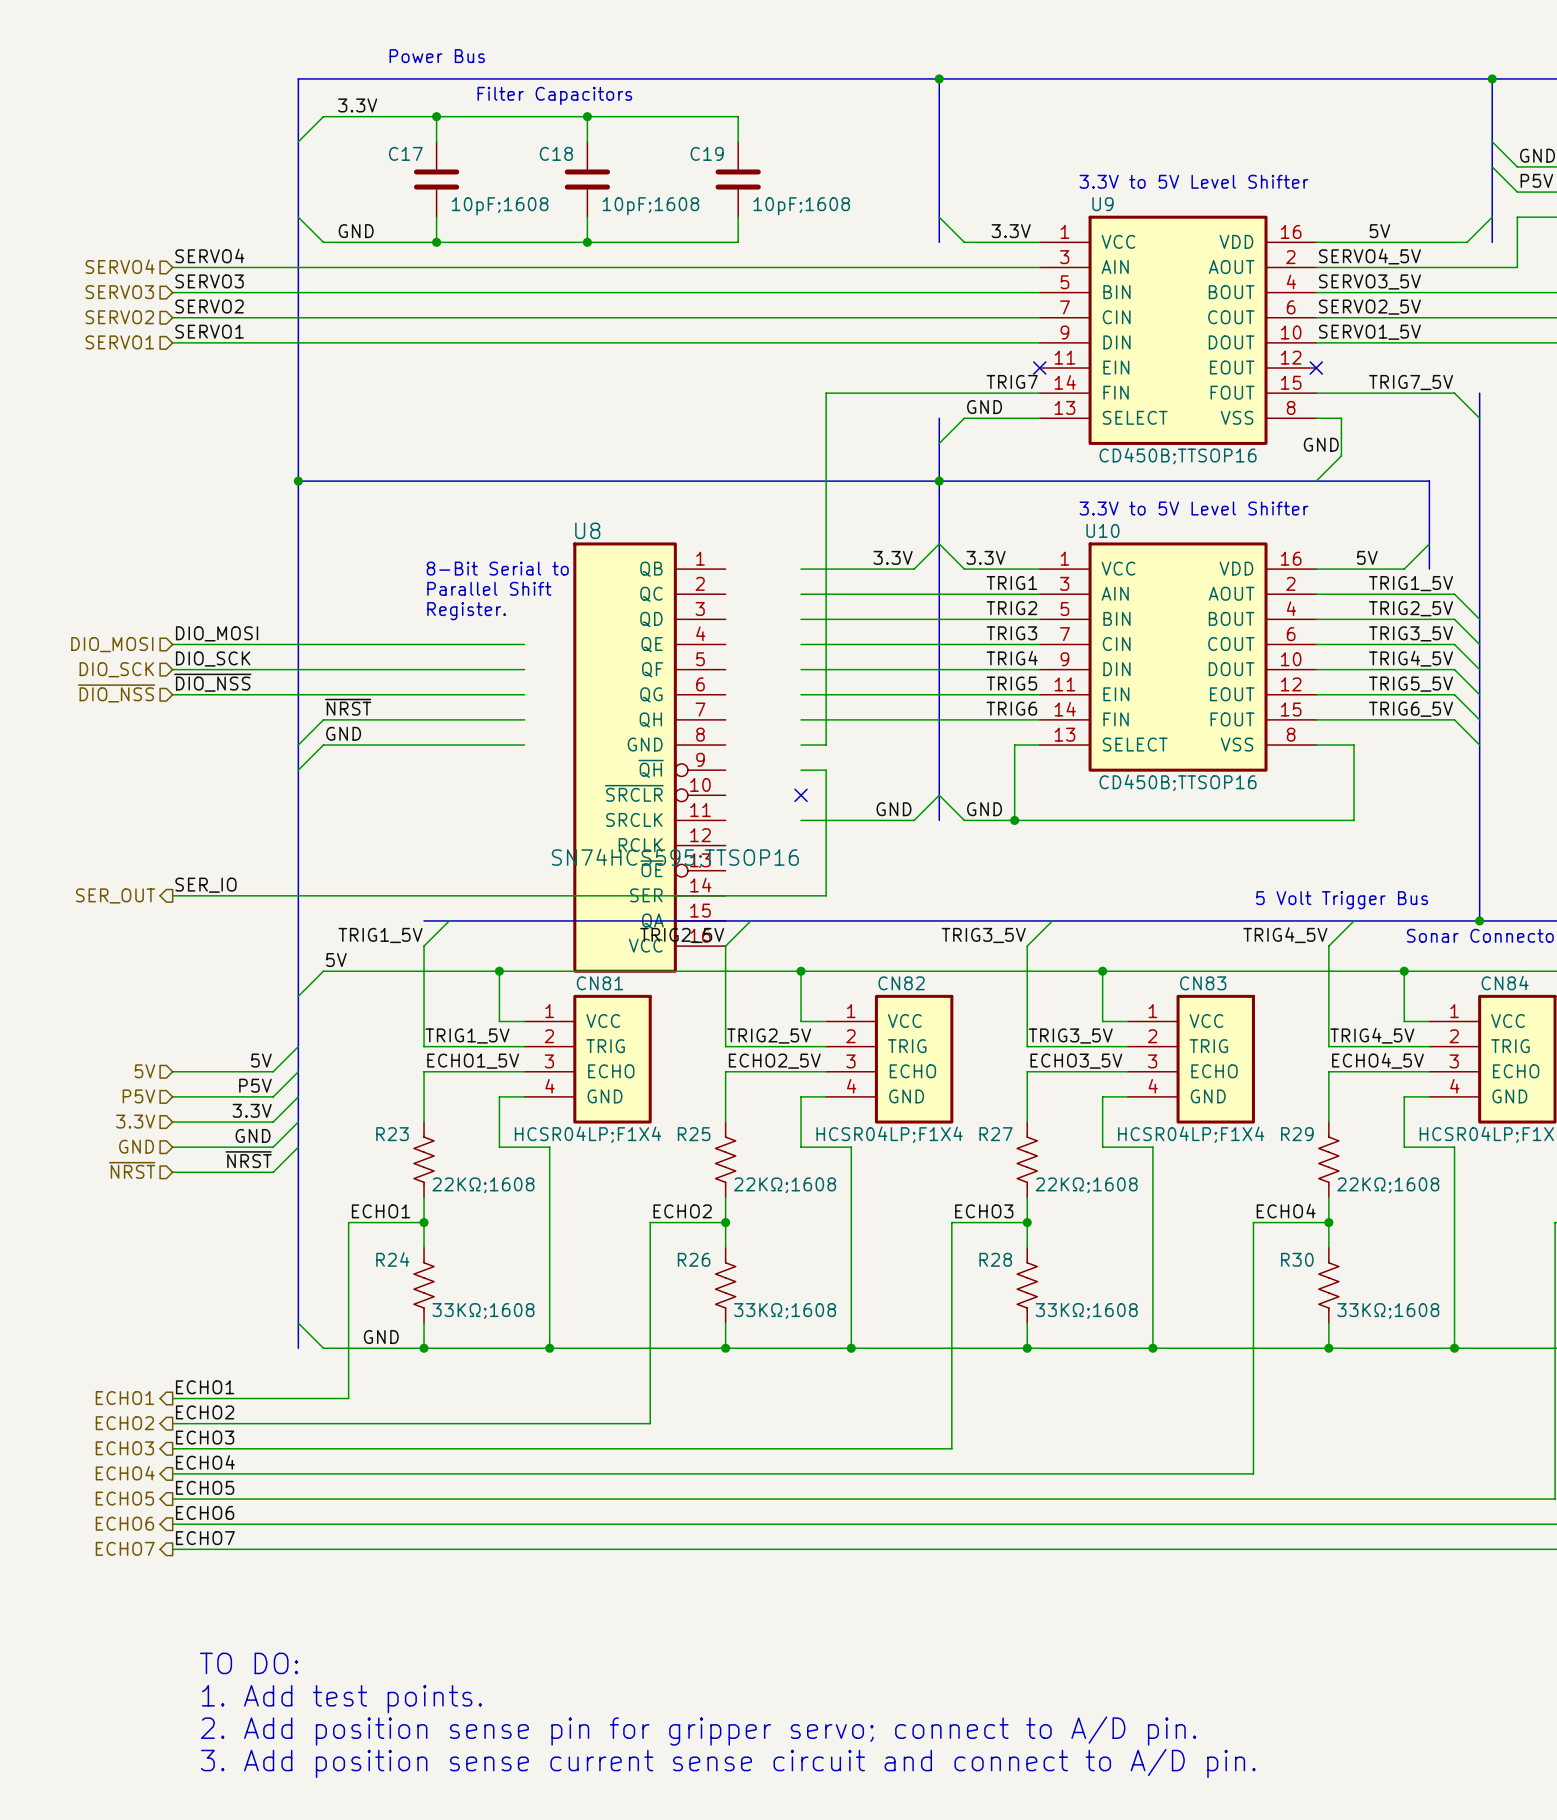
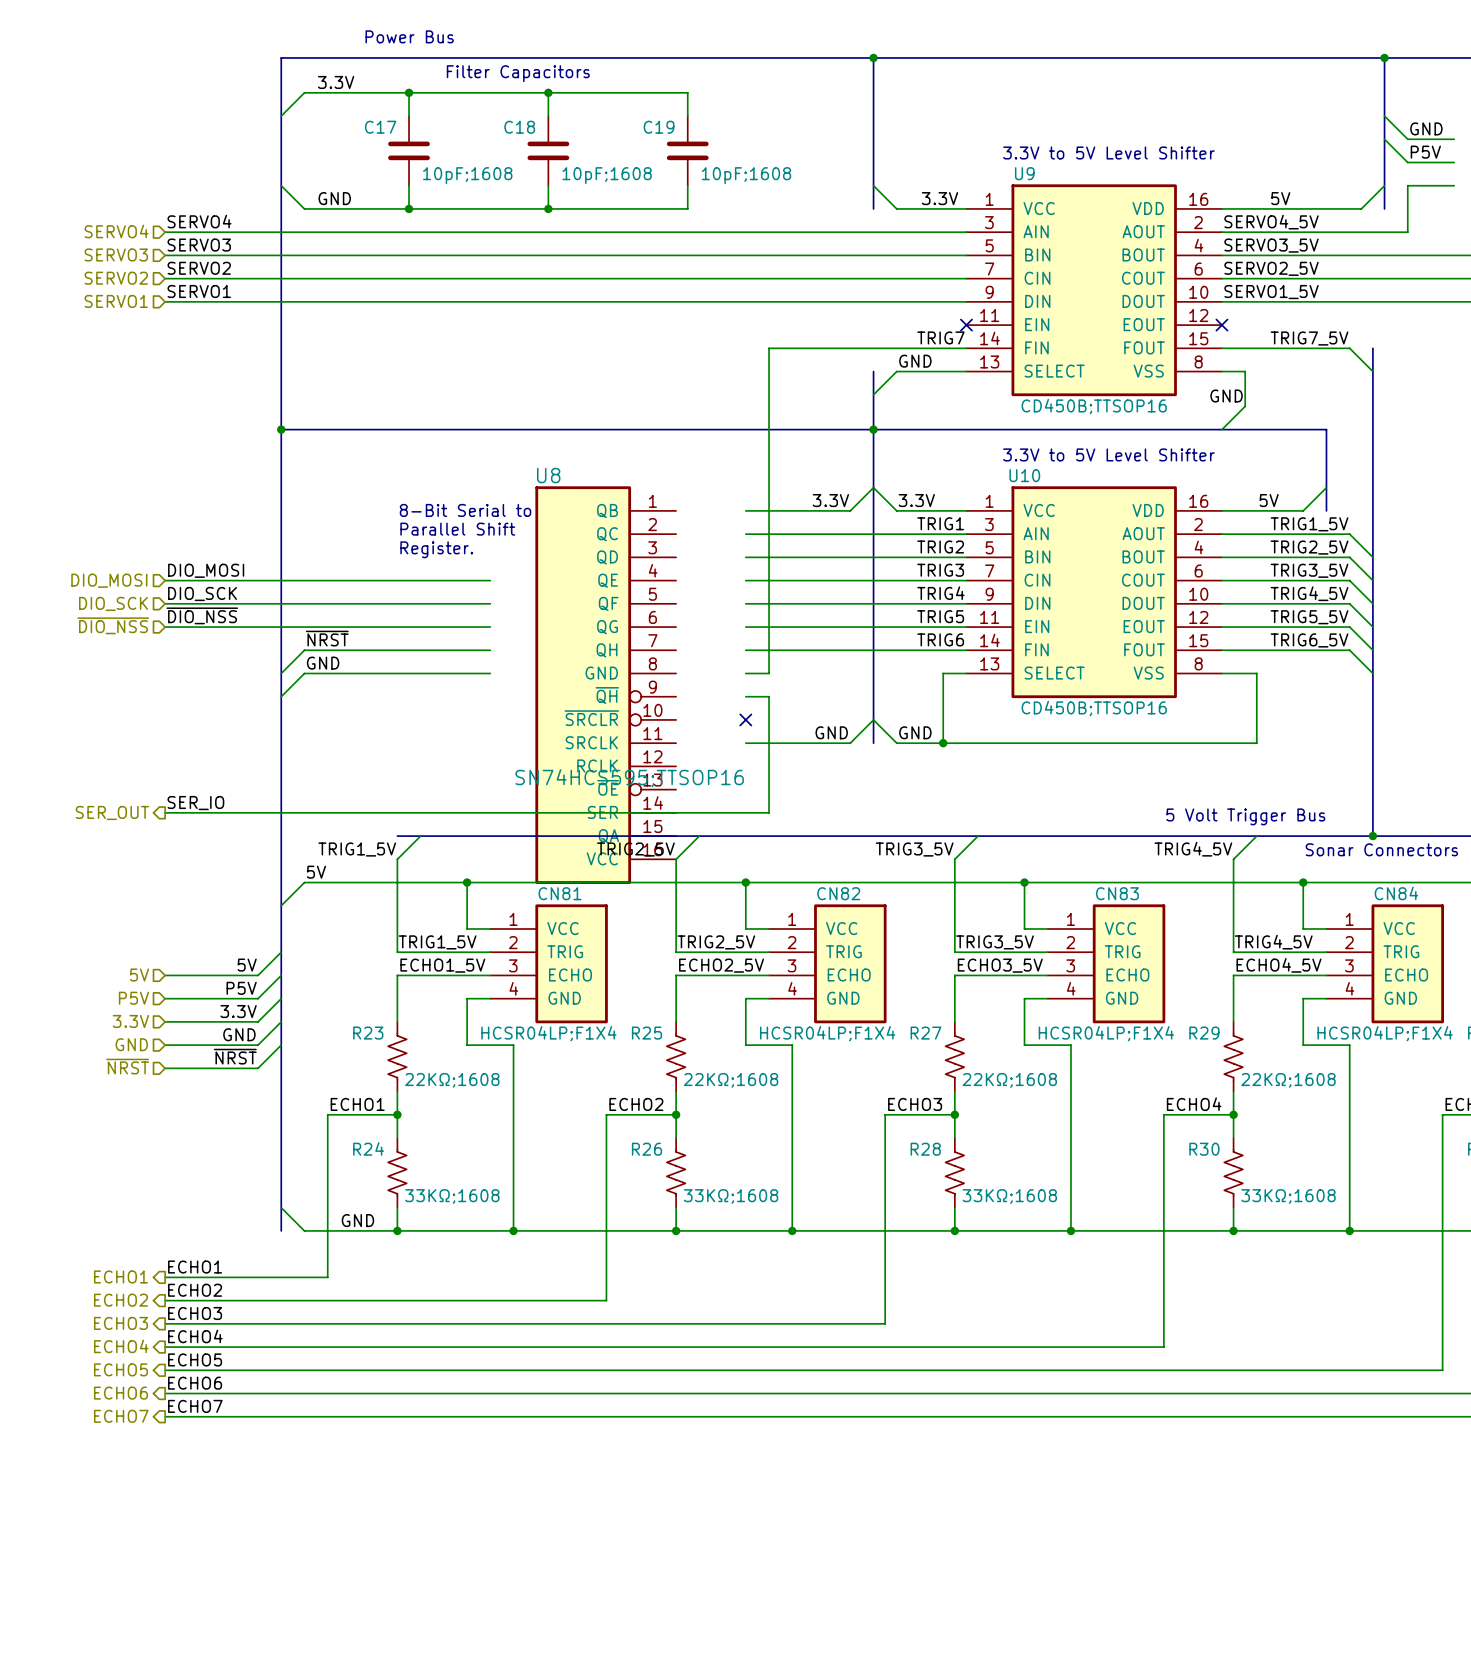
text: TO DO: (249, 1663) -> none
text: 1. Add test points. (341, 1699) -> none
text: 2. Add position sense pin for gripper servo; connect to A/D pin. (698, 1731) -> none
text: 3. Add position sense current sense circuit and connect to A/D pin. (728, 1763) -> none

